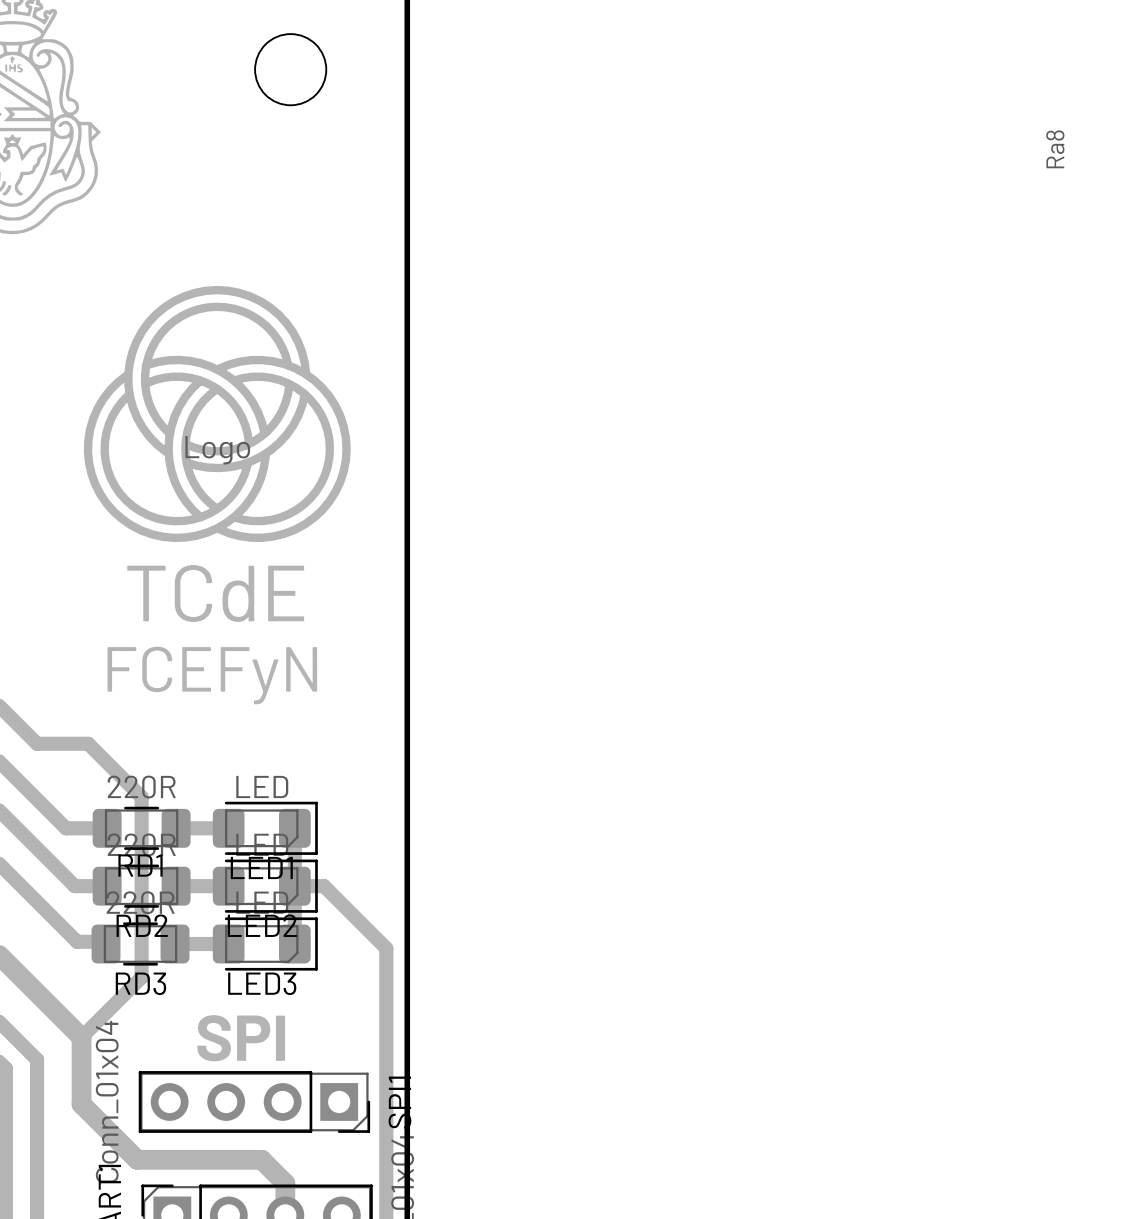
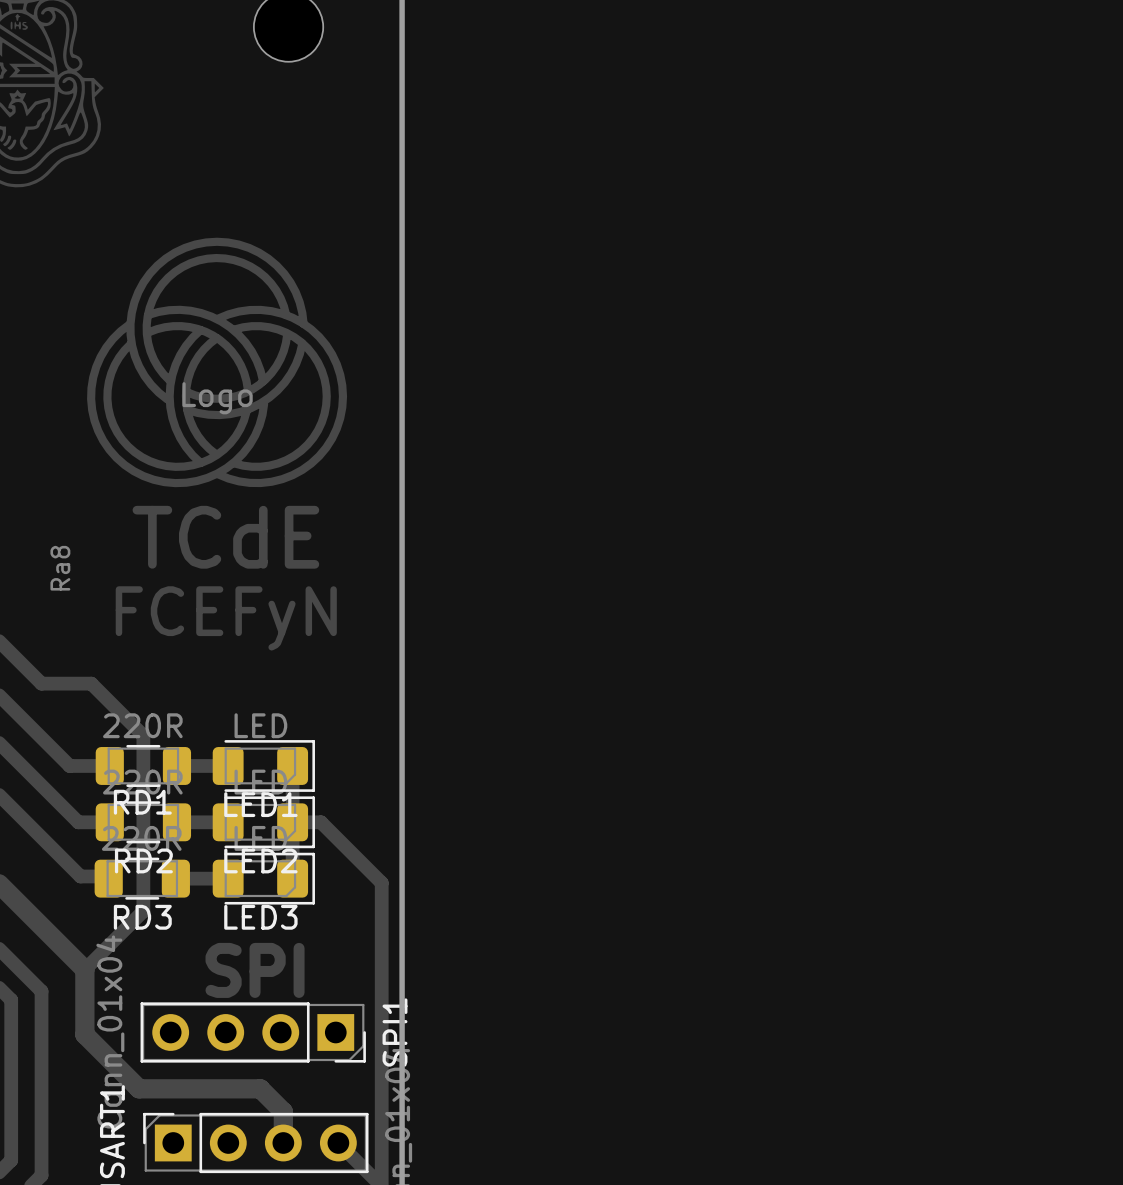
Ra8 position: (1055, 149) -> (60, 568)

